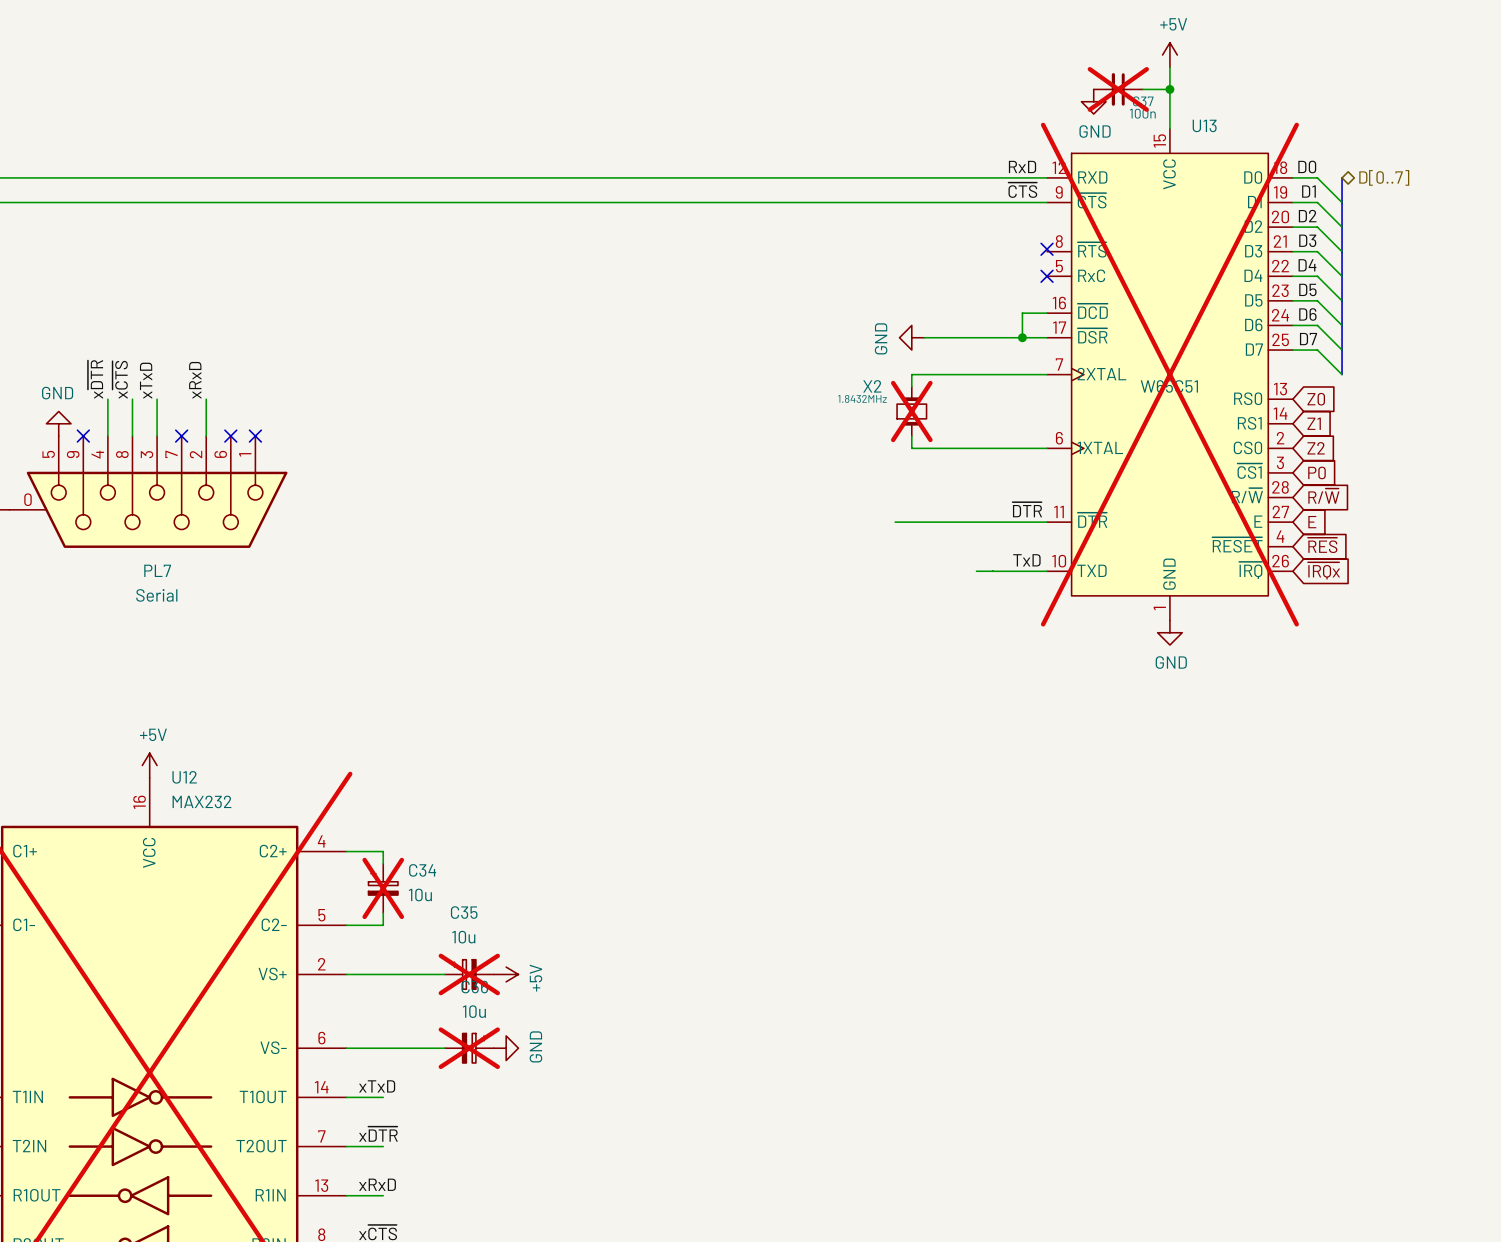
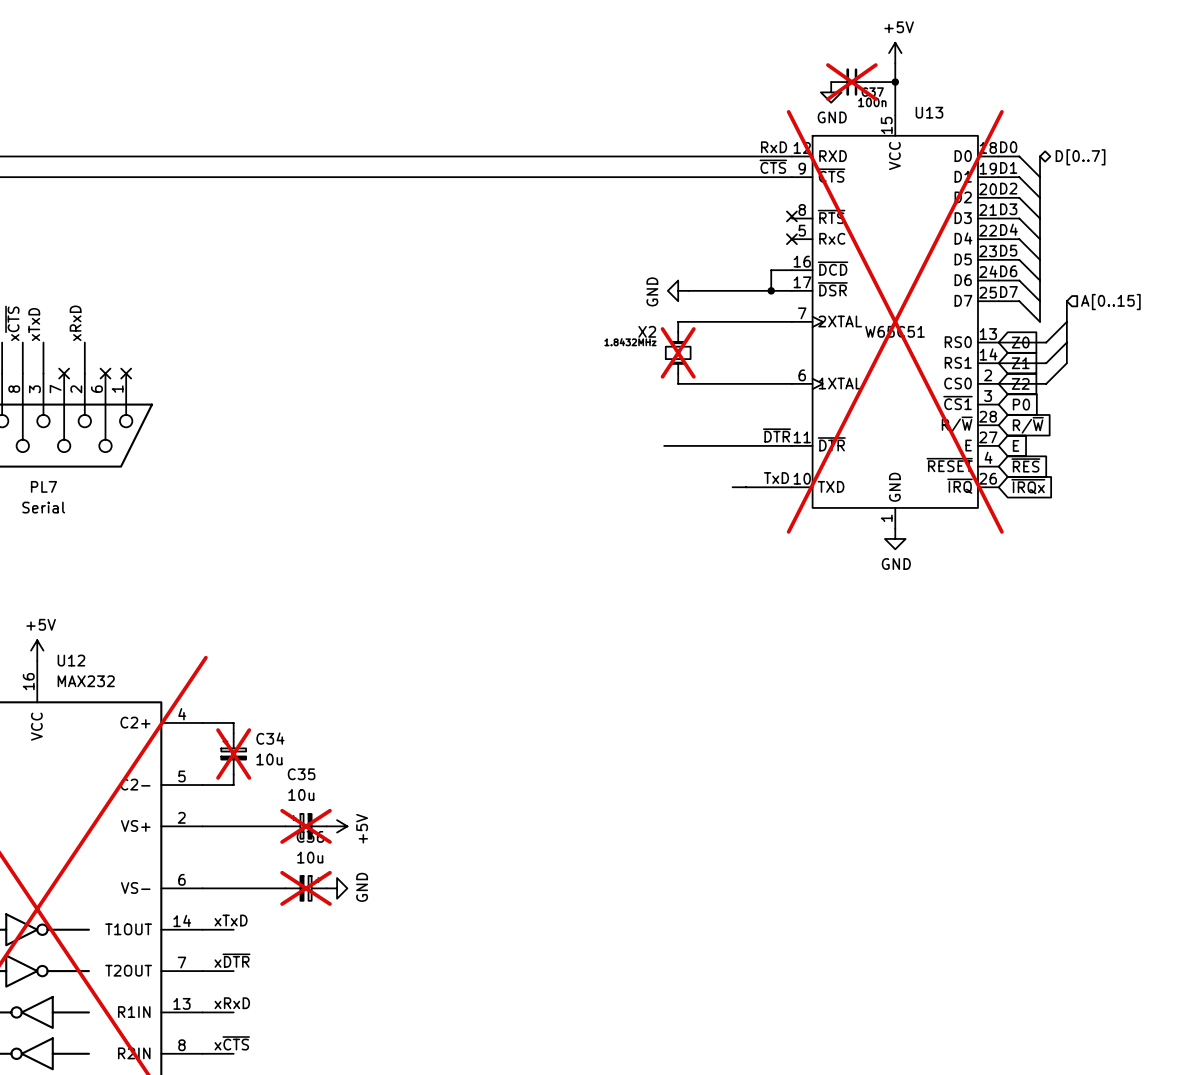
hierarchical label: none -> A[0..15] (1110, 302)
bus: none -> (1066, 301) (1066, 363)
wire: none -> (1066, 321) (1046, 342) (998, 342)
wire: none -> (1066, 342) (1046, 363) (998, 363)
wire: none -> (1066, 363) (1046, 383) (998, 383)

